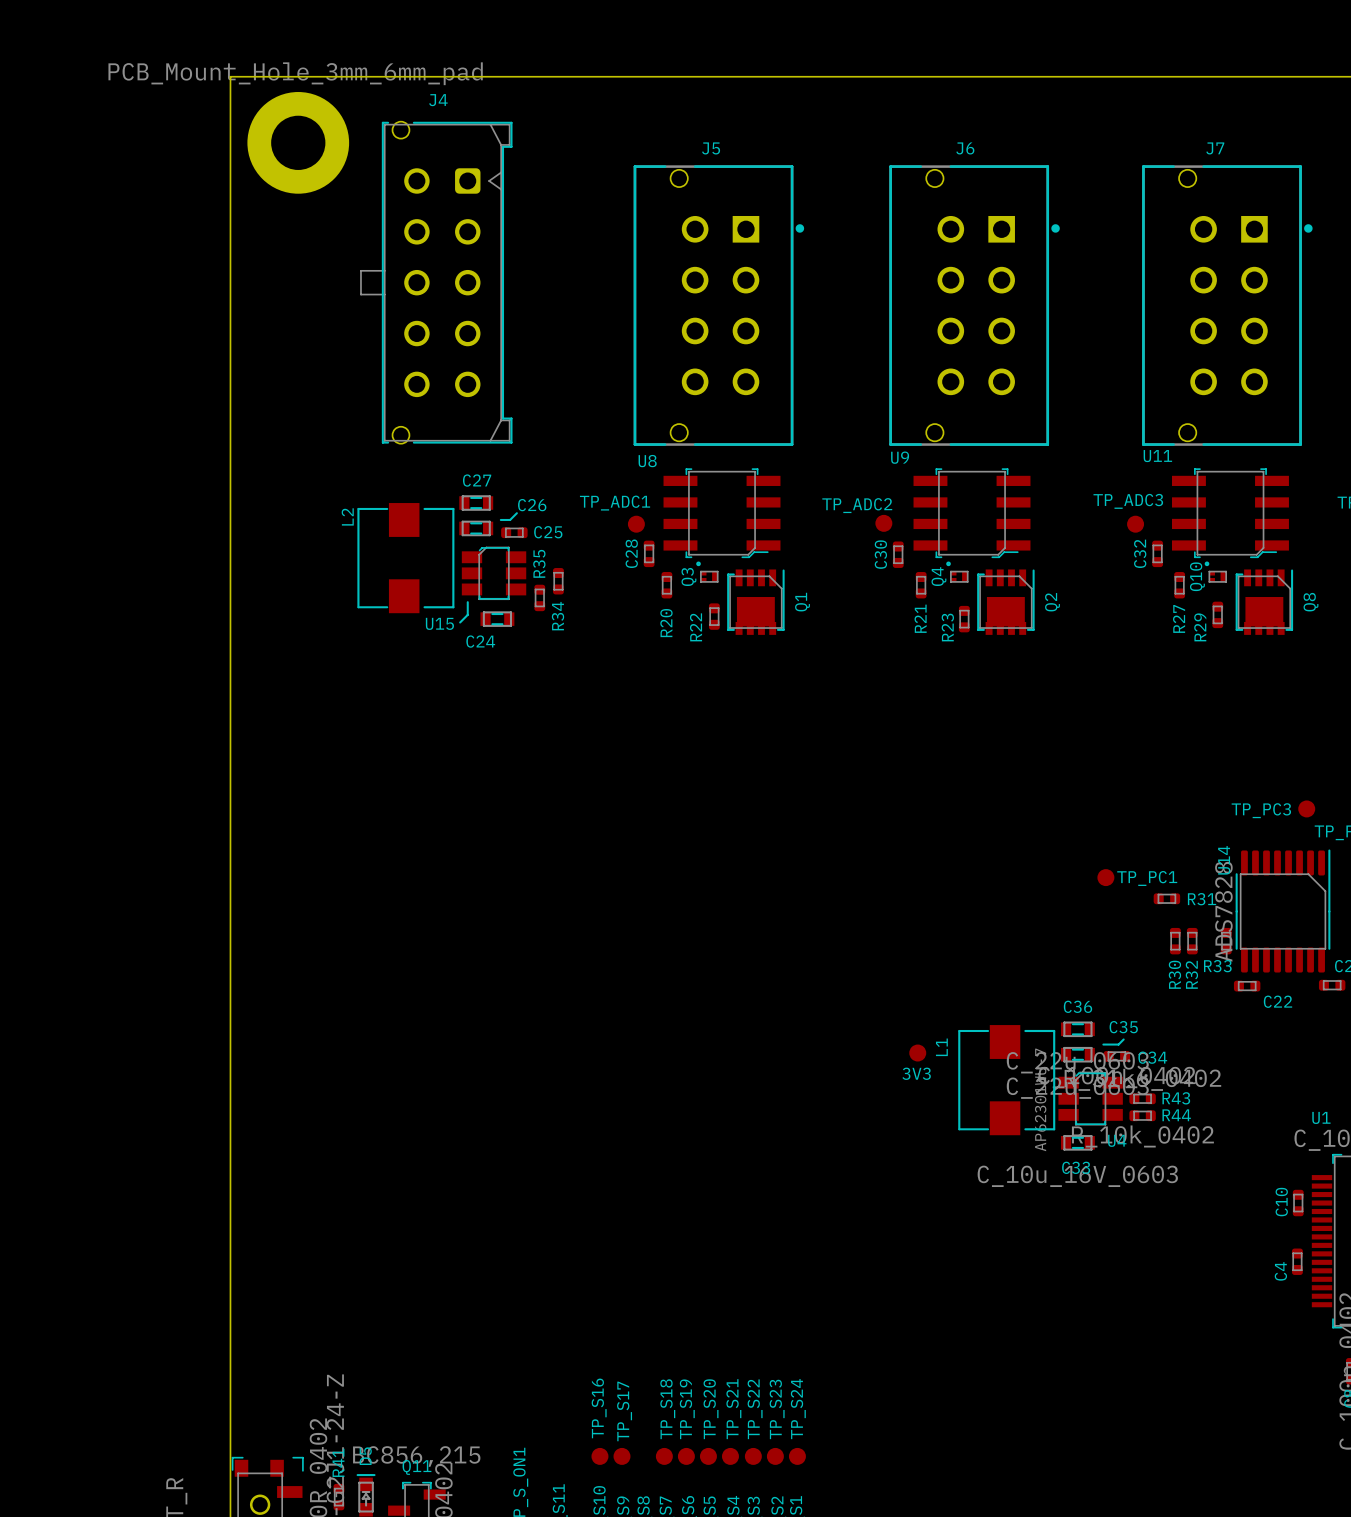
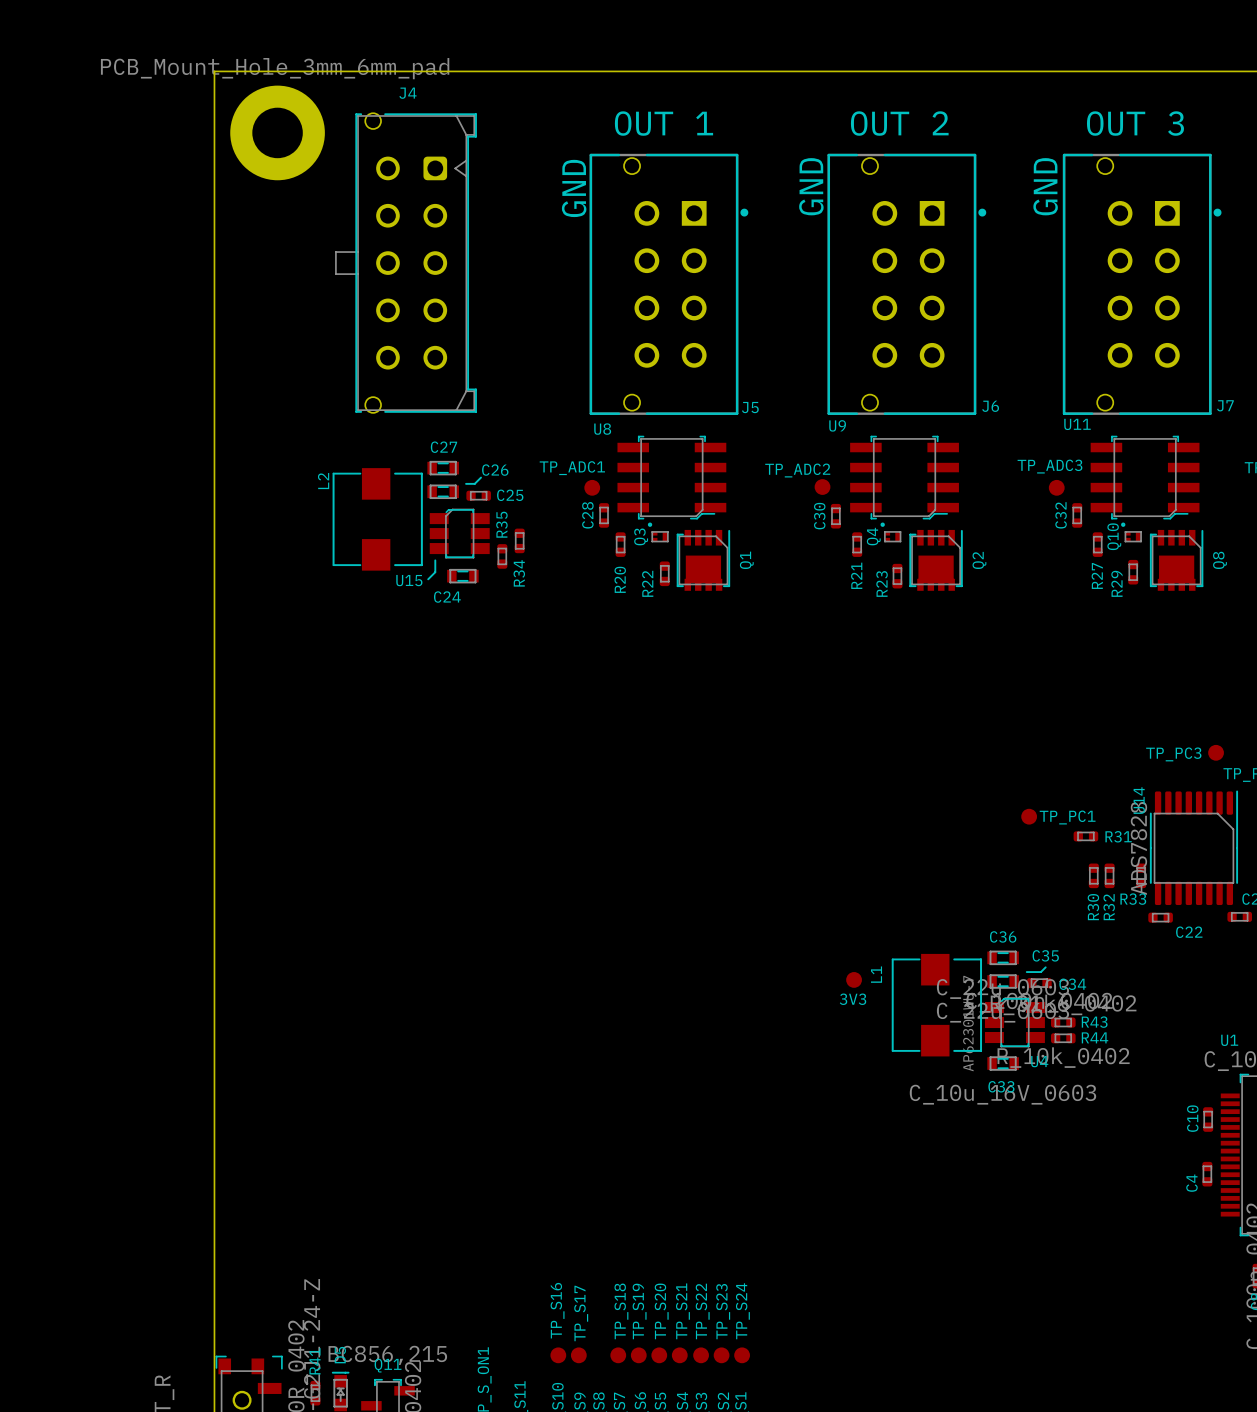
text: none -> OUT 1 (663, 123)
text: none -> OUT 2 (899, 123)
text: none -> OUT 3 (1135, 123)
J5 name position: J5 (711, 148) -> J5 (750, 407)
J6 name position: J6 (965, 148) -> J6 (990, 406)
J7 name position: J7 (1215, 148) -> J7 (1225, 405)
text: none -> GND (811, 186)
text: none -> GND (1045, 186)
text: none -> GND (574, 188)

